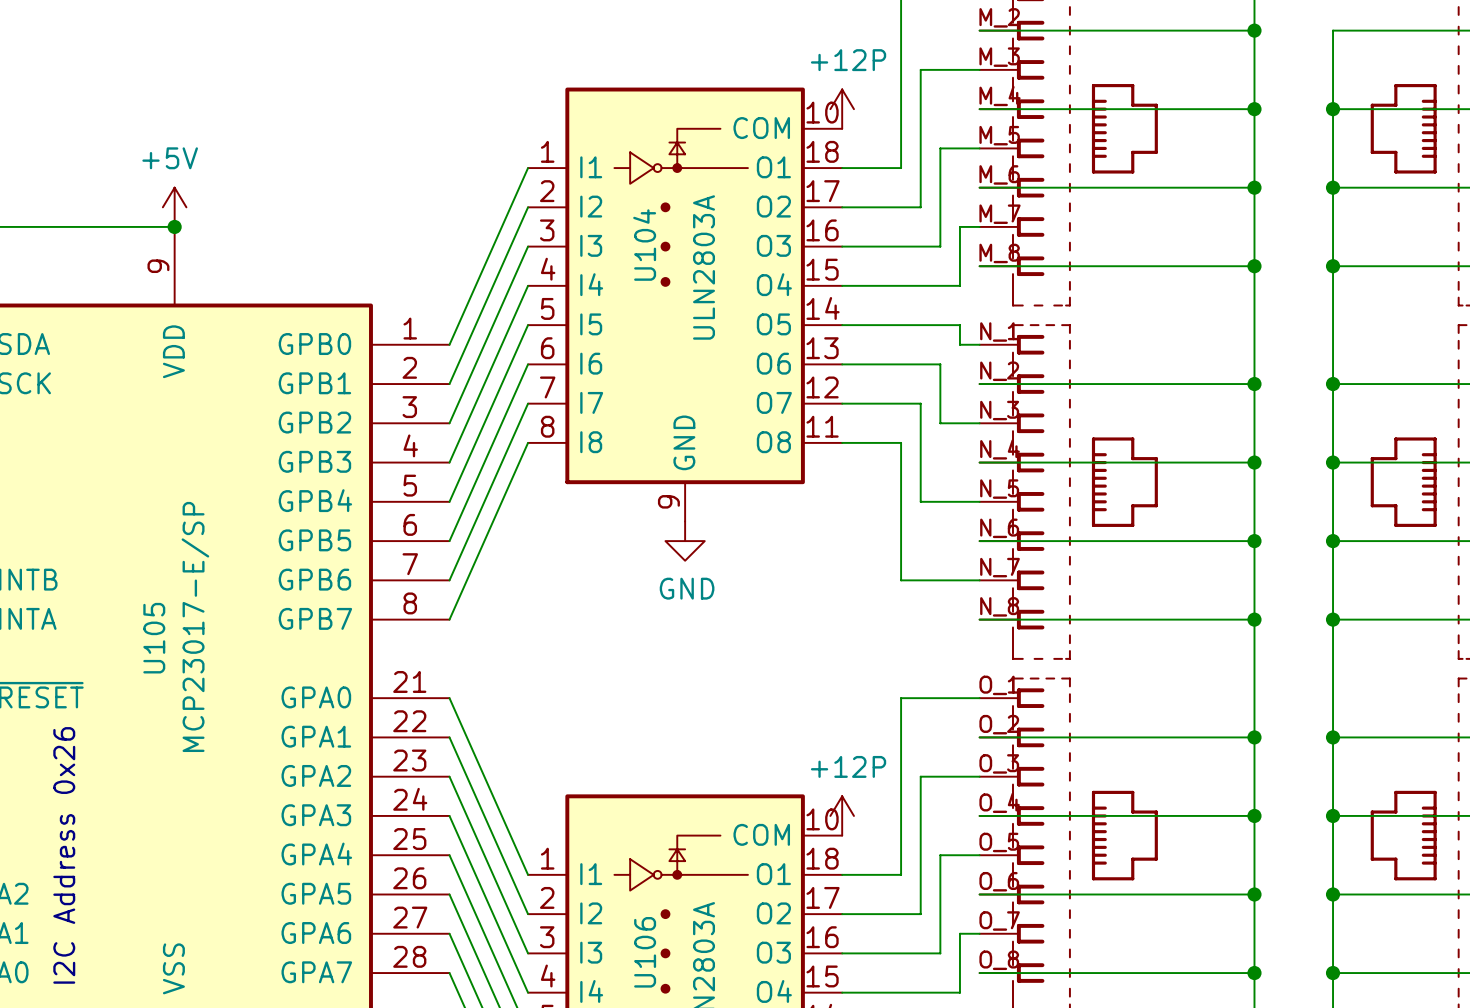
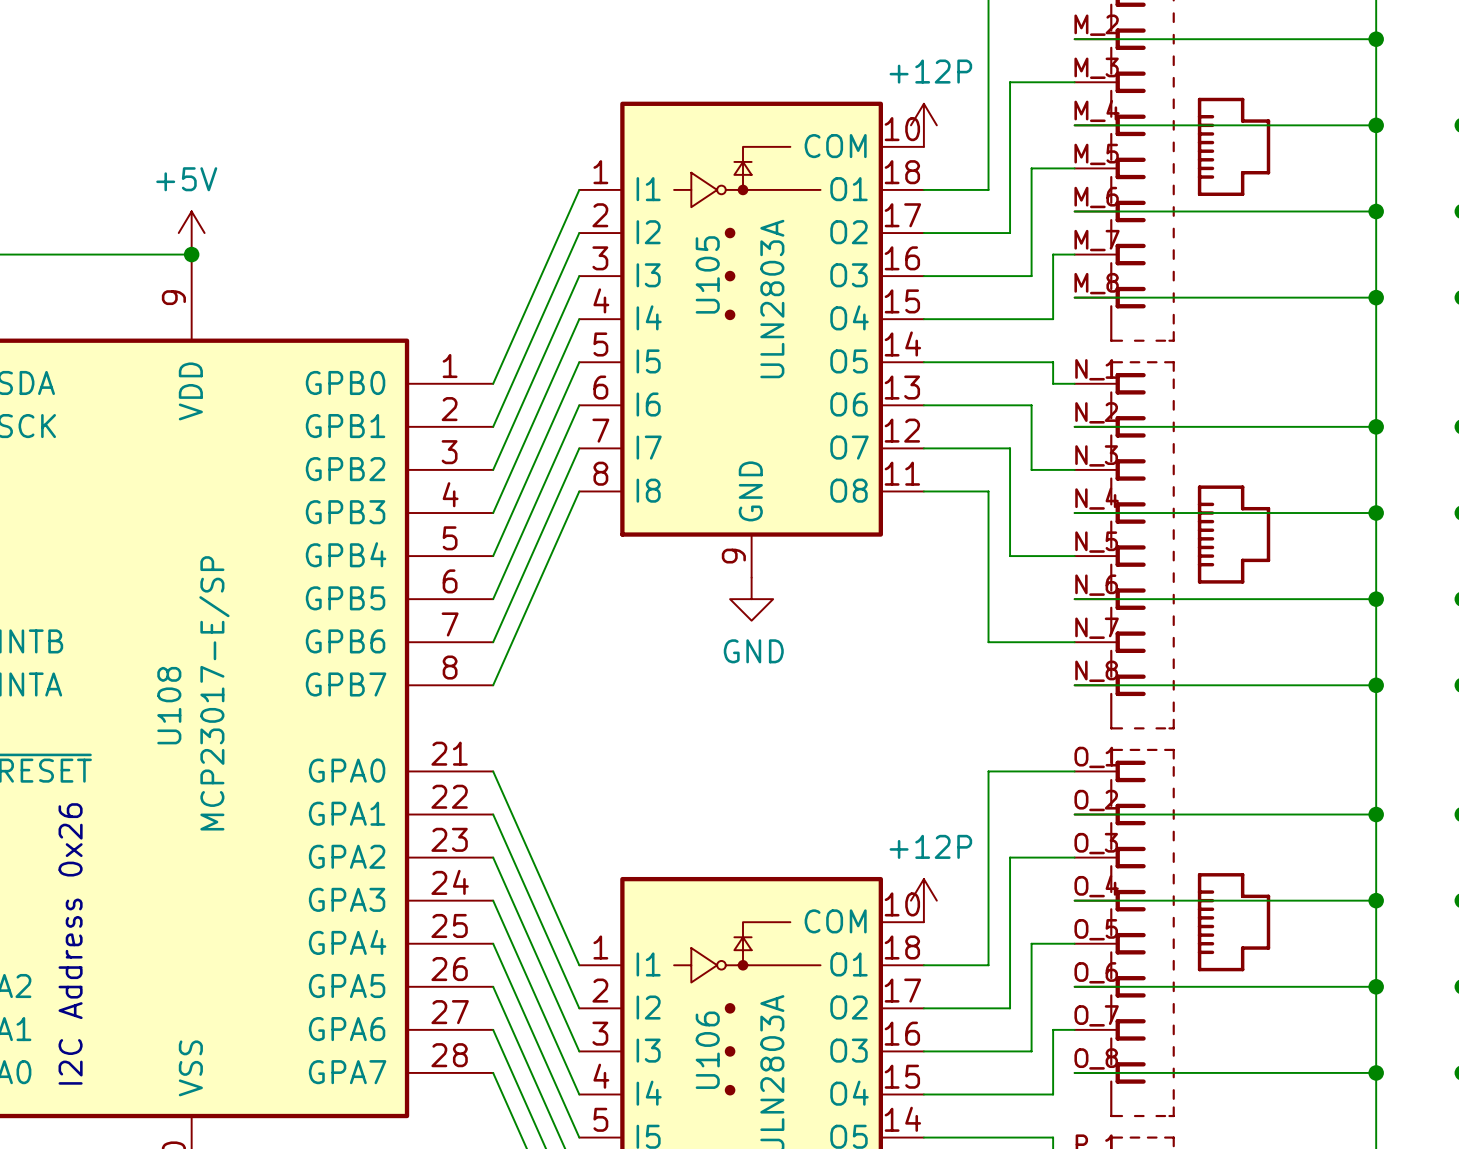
U104 name: U104 (644, 245) -> U105 (707, 274)
U105 name: U105 (154, 638) -> U108 (169, 705)

